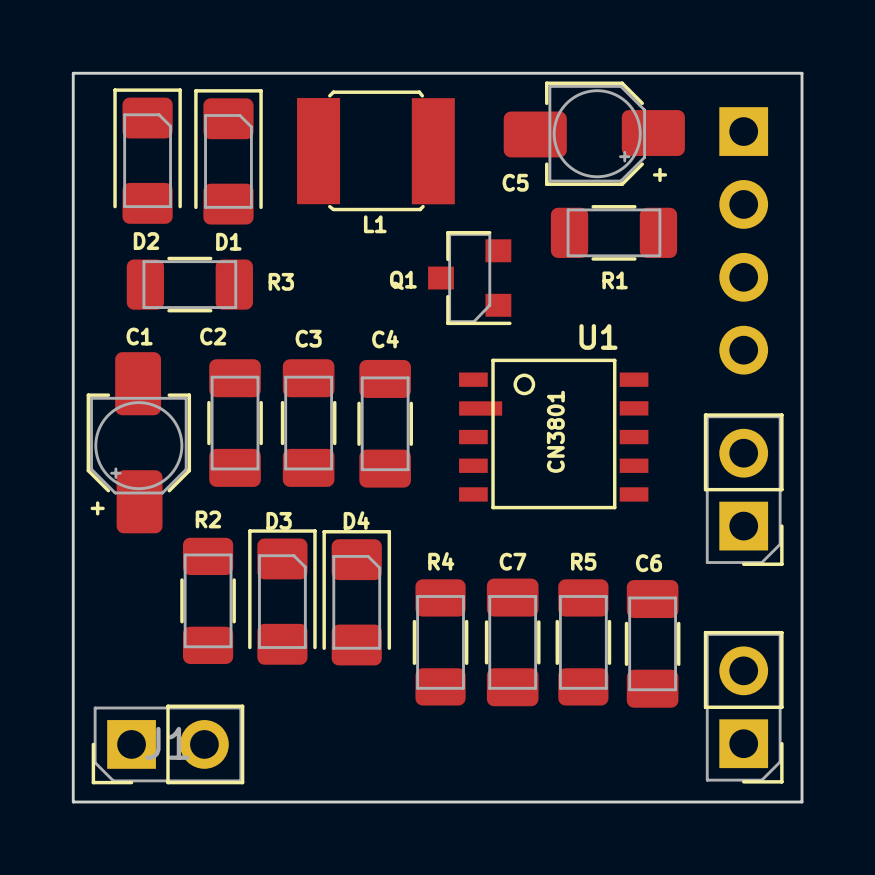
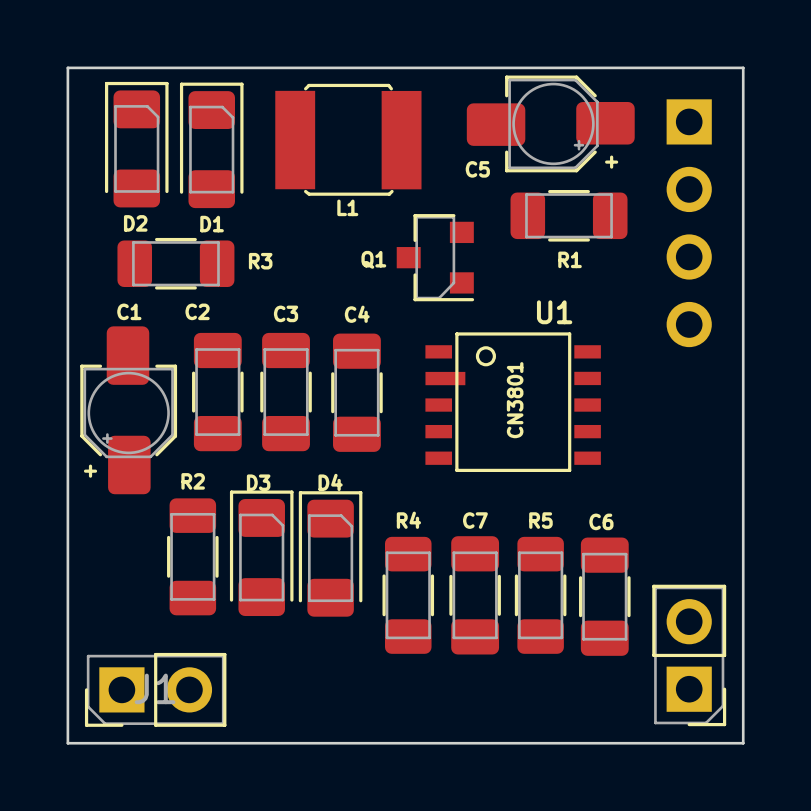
part: (743, 489) -> none

